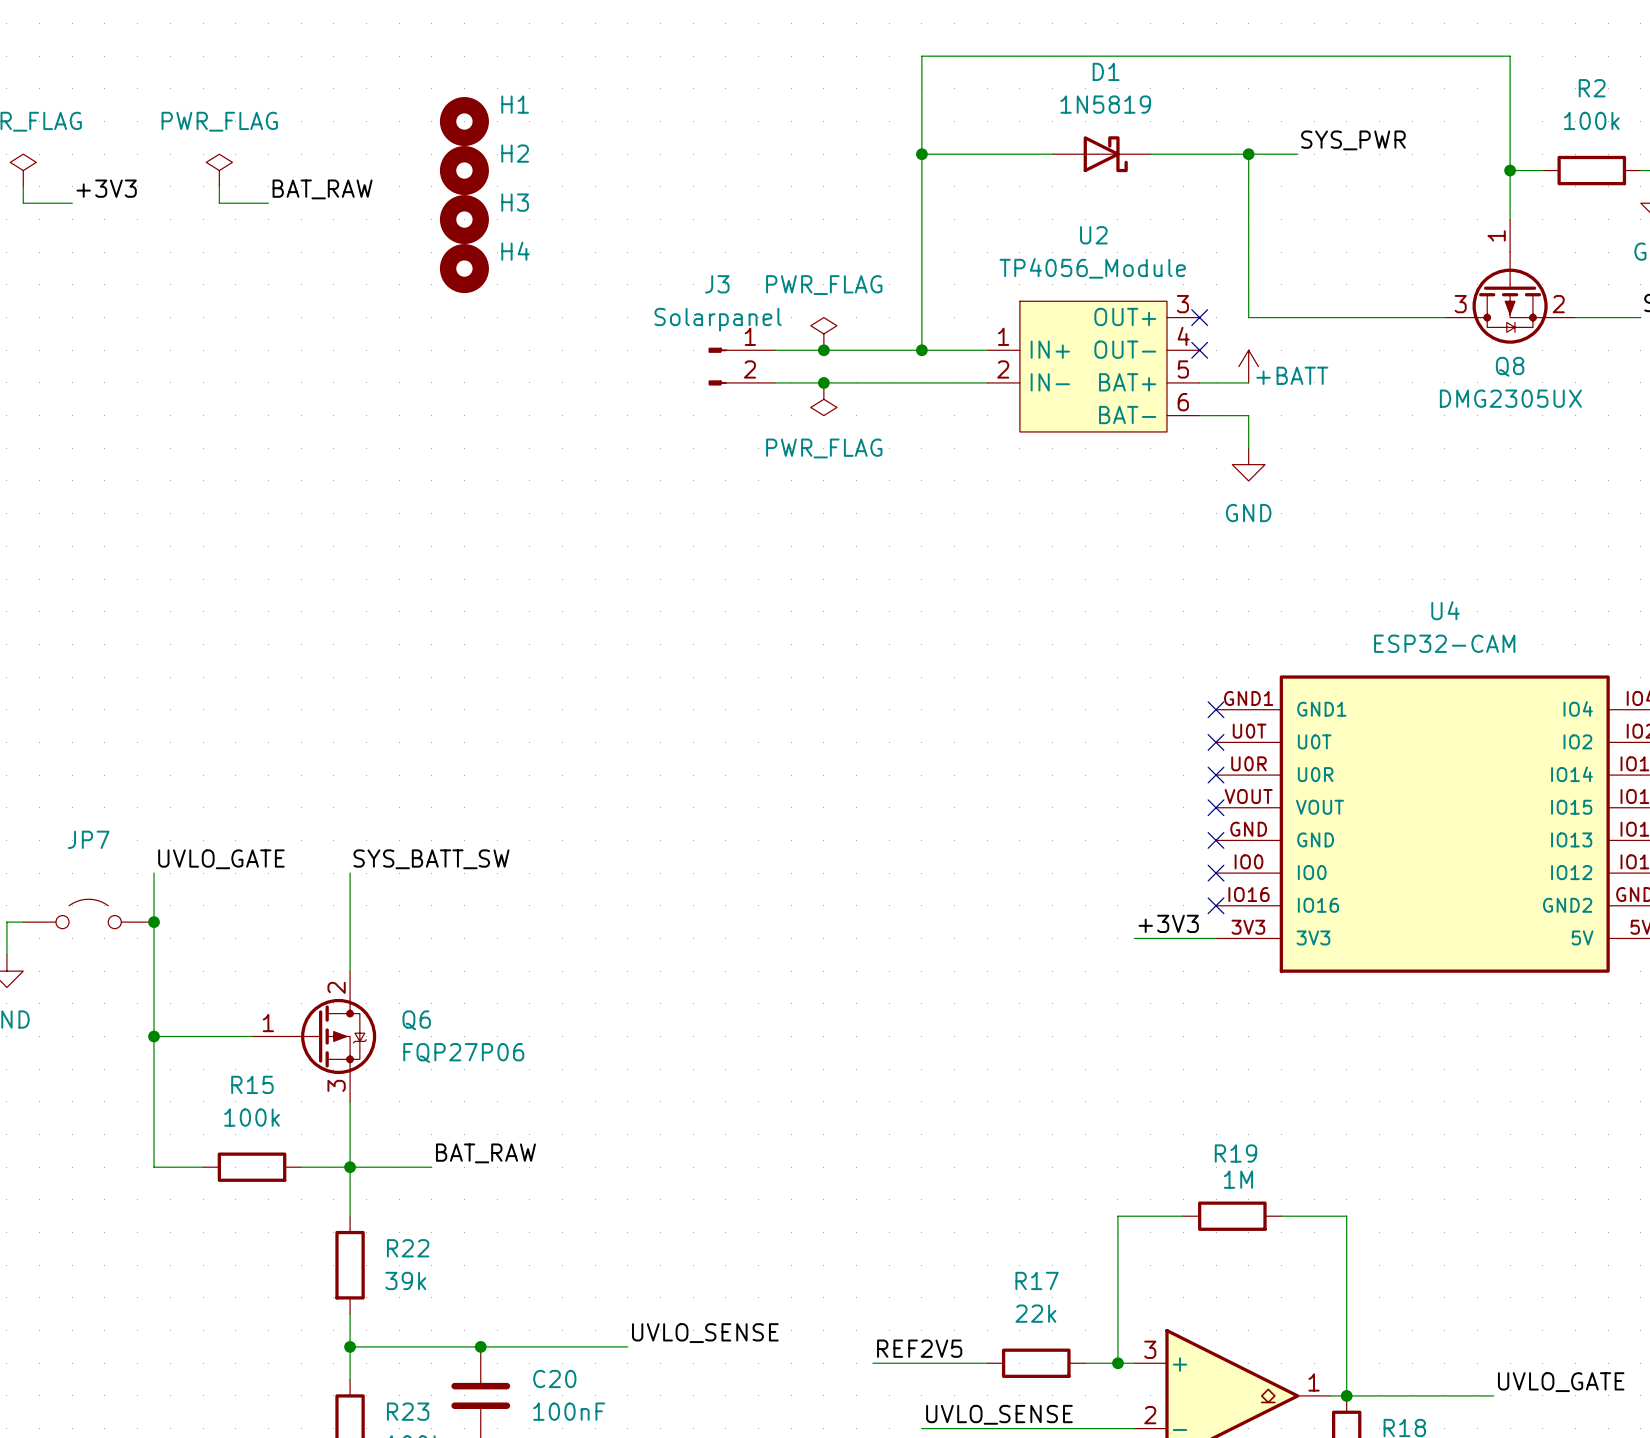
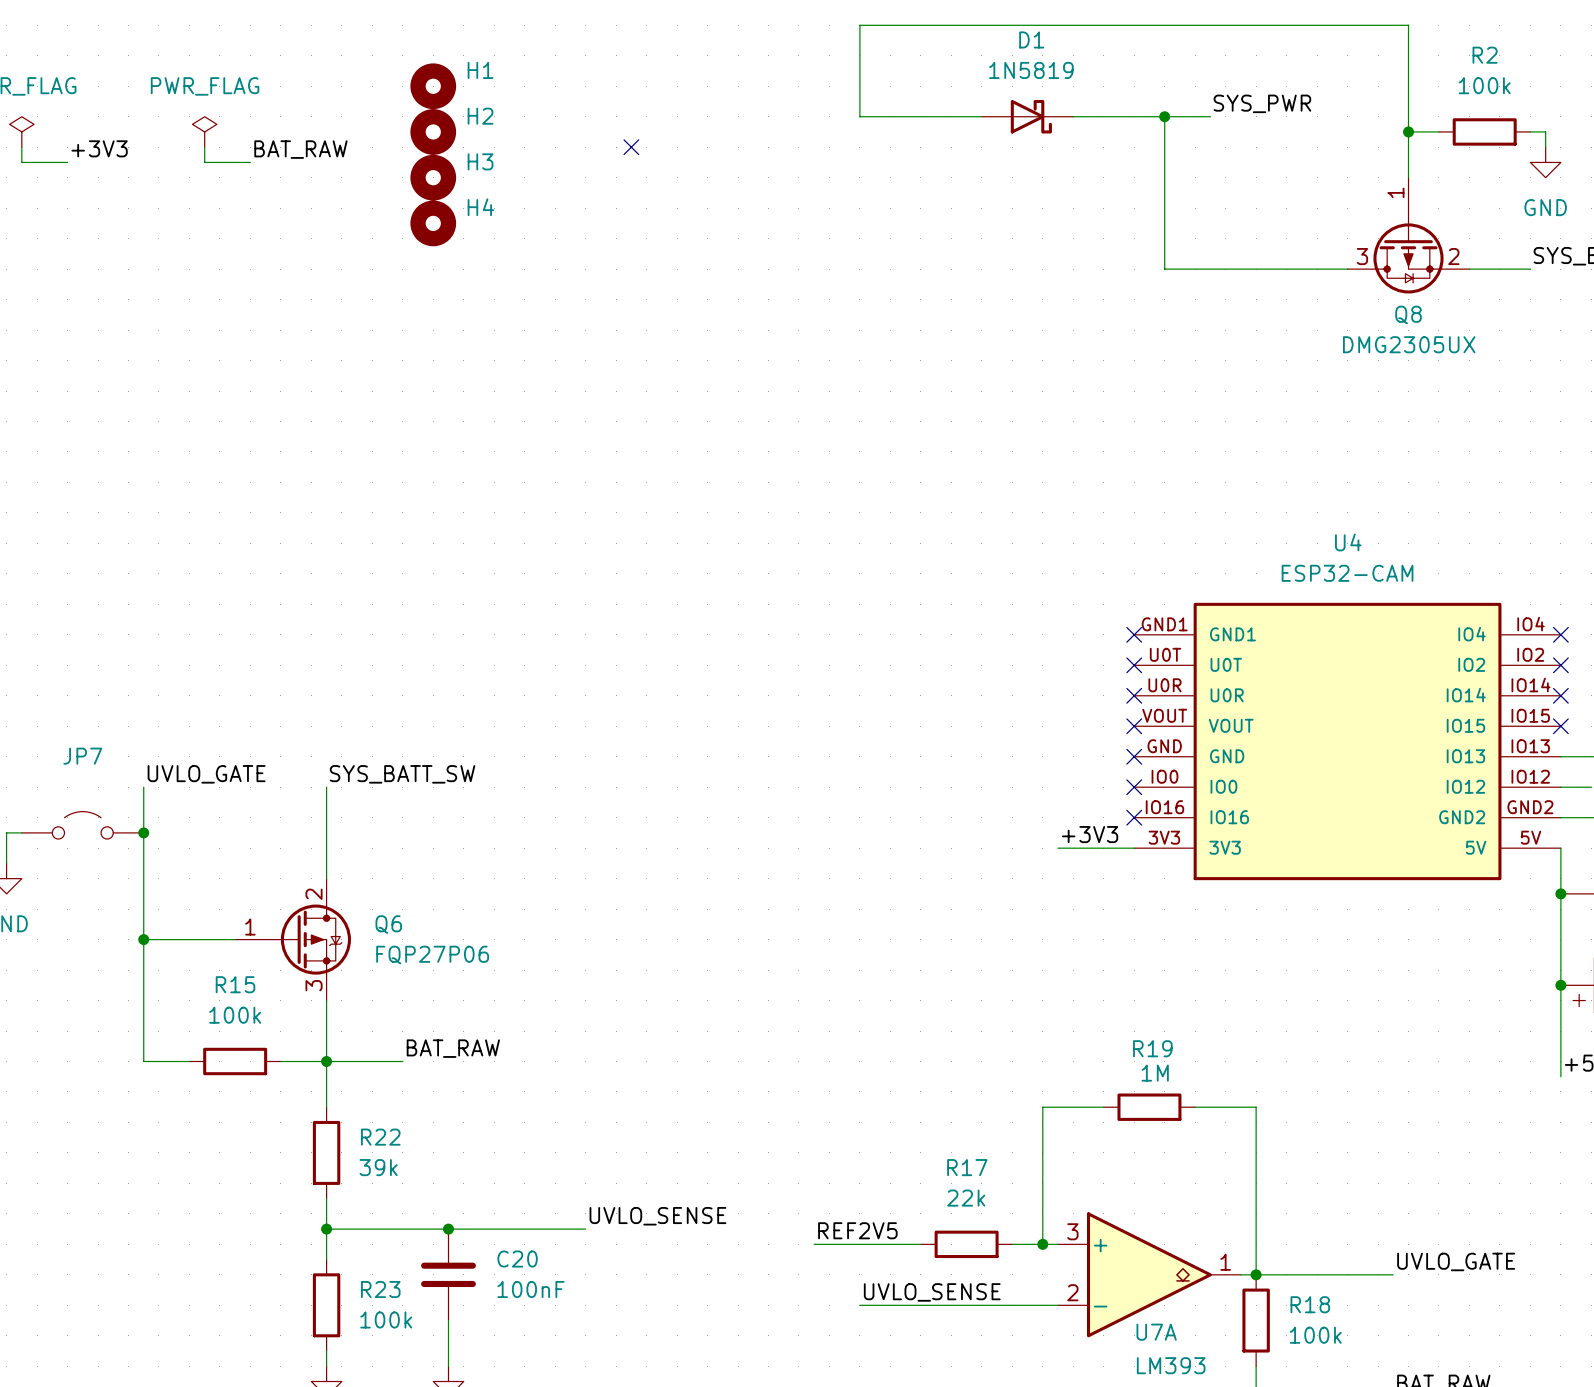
wire: (921, 154) (921, 350) -> none
junction: (921, 154) -> none
no-connect mark: none -> (631, 147)
no-connect mark: (1199, 317) -> none
power symbol: PWR_FLAG (823, 333) -> none
wire: (774, 350) (987, 350) -> none
junction: (823, 350) -> none
junction: (921, 350) -> none
no-connect mark: (1199, 350) -> none
J3: Solarpanel (741, 366) -> none
U2: TP4056_Module (1093, 366) -> none
power symbol: +BATT (1248, 366) -> none
wire: (774, 382) (987, 382) -> none
junction: (823, 382) -> none
wire: (1199, 382) (1248, 382) -> none
power symbol: PWR_FLAG (823, 399) -> none
wire: (1199, 415) (1248, 415) (1248, 448) -> none
power symbol: GND (1248, 464) -> none

